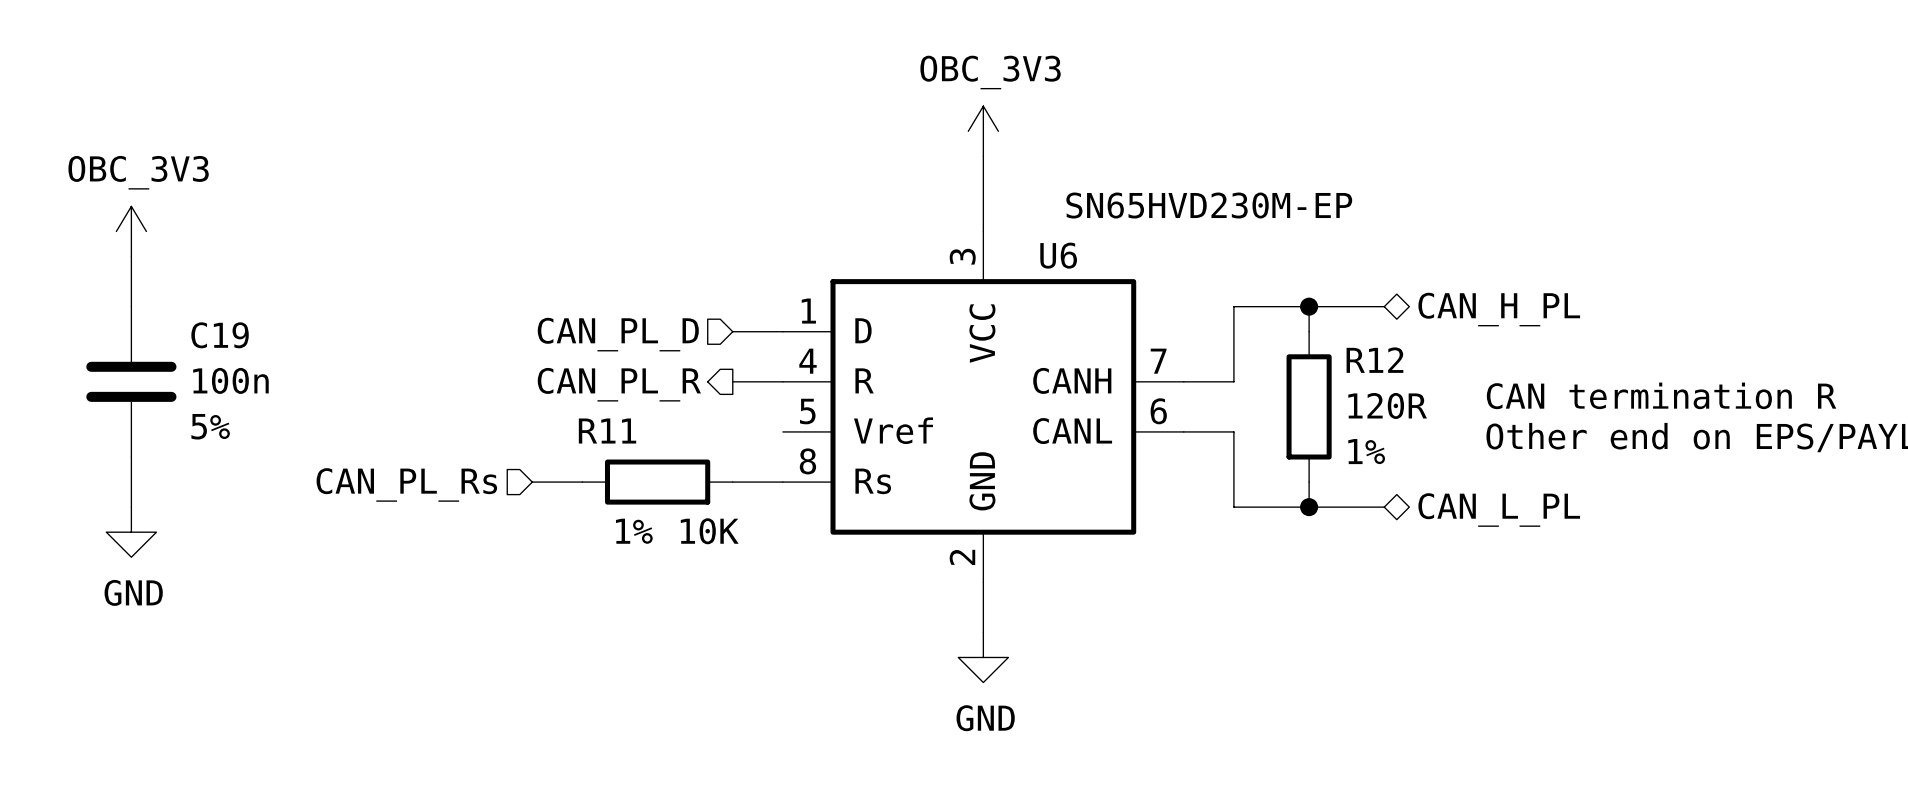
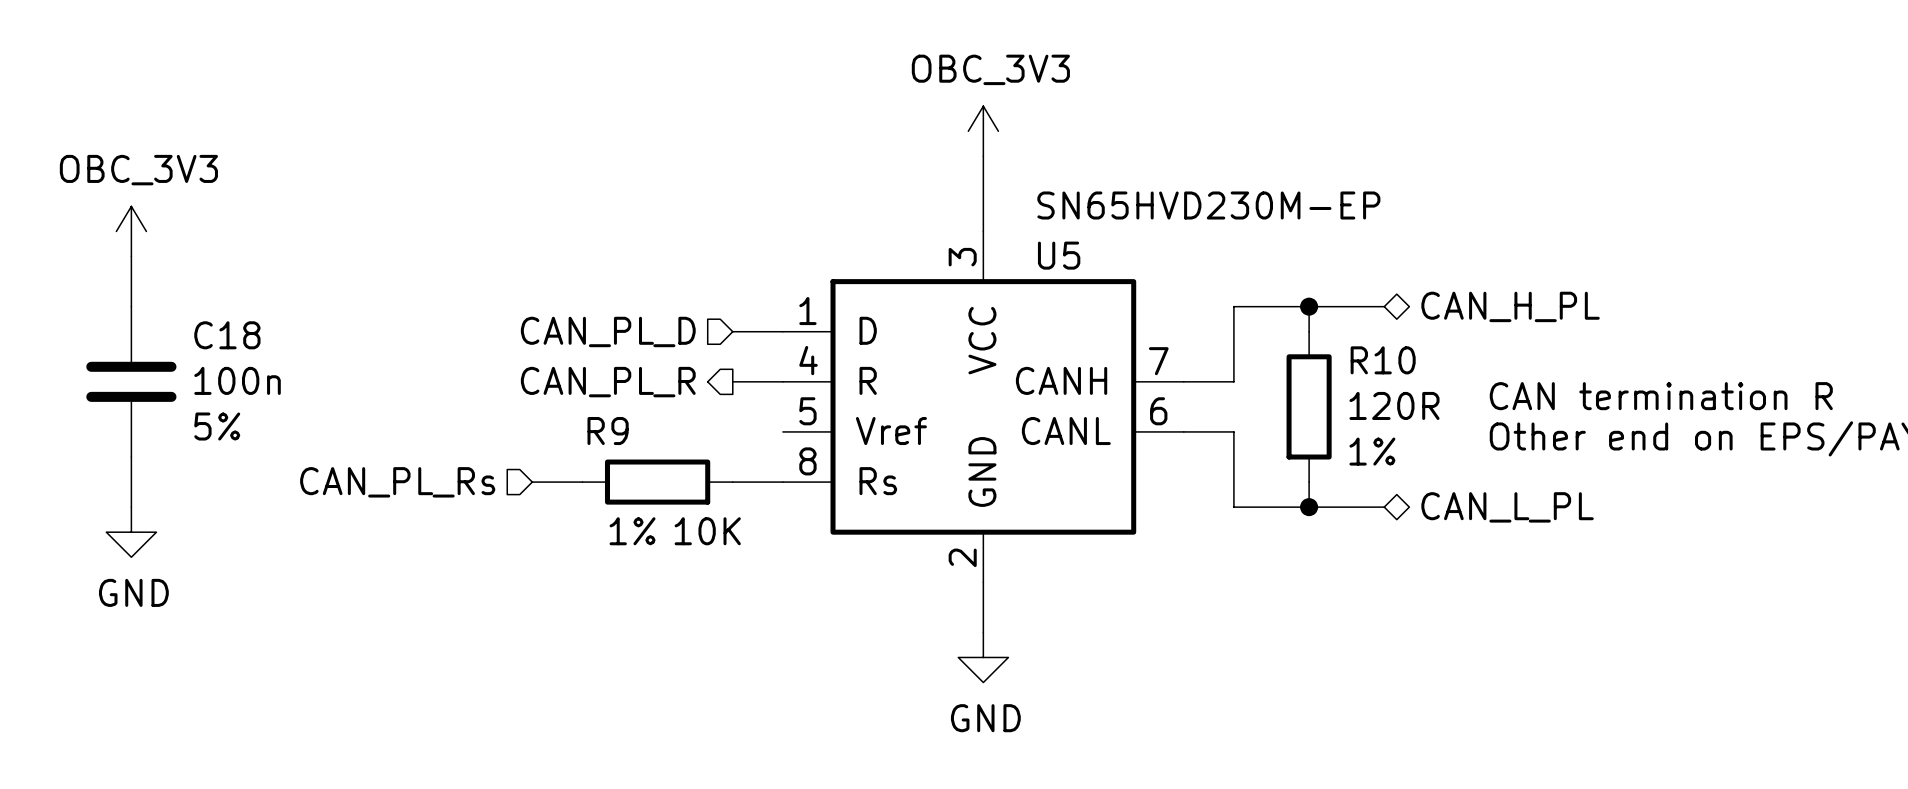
U6 name: U6 (1058, 255) -> U5 (1059, 255)
C19 name: C19 (220, 335) -> C18 (227, 335)
R12 name: R12 (1374, 360) -> R10 (1383, 360)
R11 name: R11 (607, 431) -> R9 (608, 431)

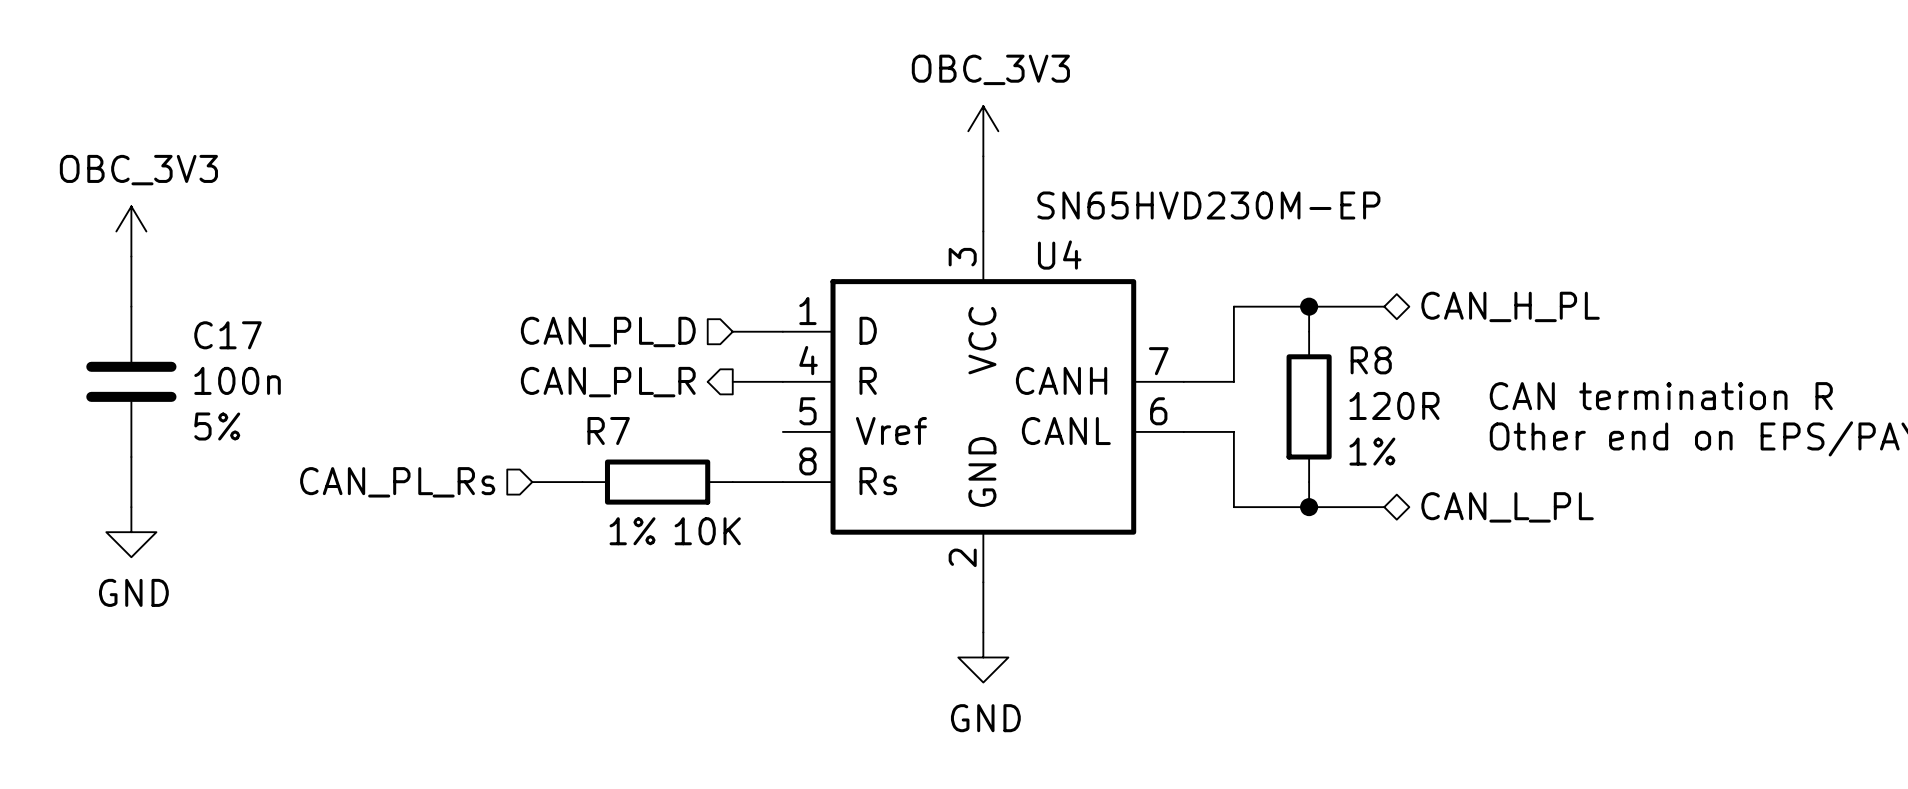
U5 name: U5 (1059, 255) -> U4 (1059, 255)
C18 name: C18 (227, 335) -> C17 (227, 335)
R10 name: R10 (1383, 360) -> R8 (1371, 360)
R9 name: R9 (608, 431) -> R7 (608, 431)

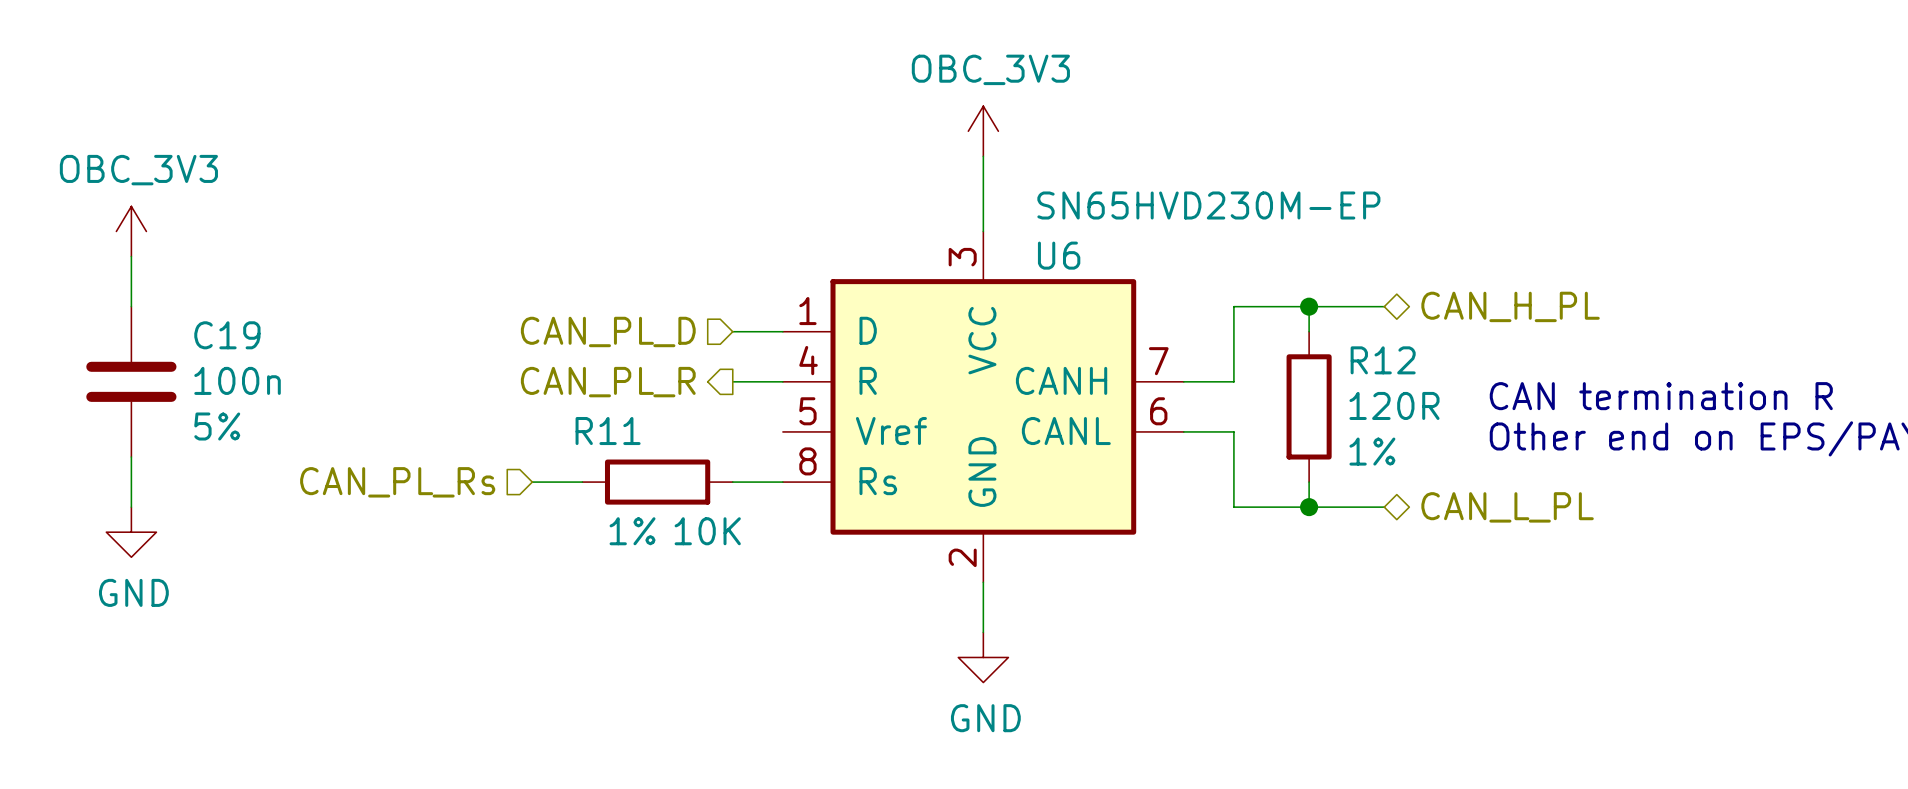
U4 name: U4 (1059, 255) -> U6 (1059, 255)
C17 name: C17 (227, 335) -> C19 (227, 335)
R8 name: R8 (1371, 360) -> R12 (1383, 360)
R7 name: R7 (608, 431) -> R11 (608, 431)

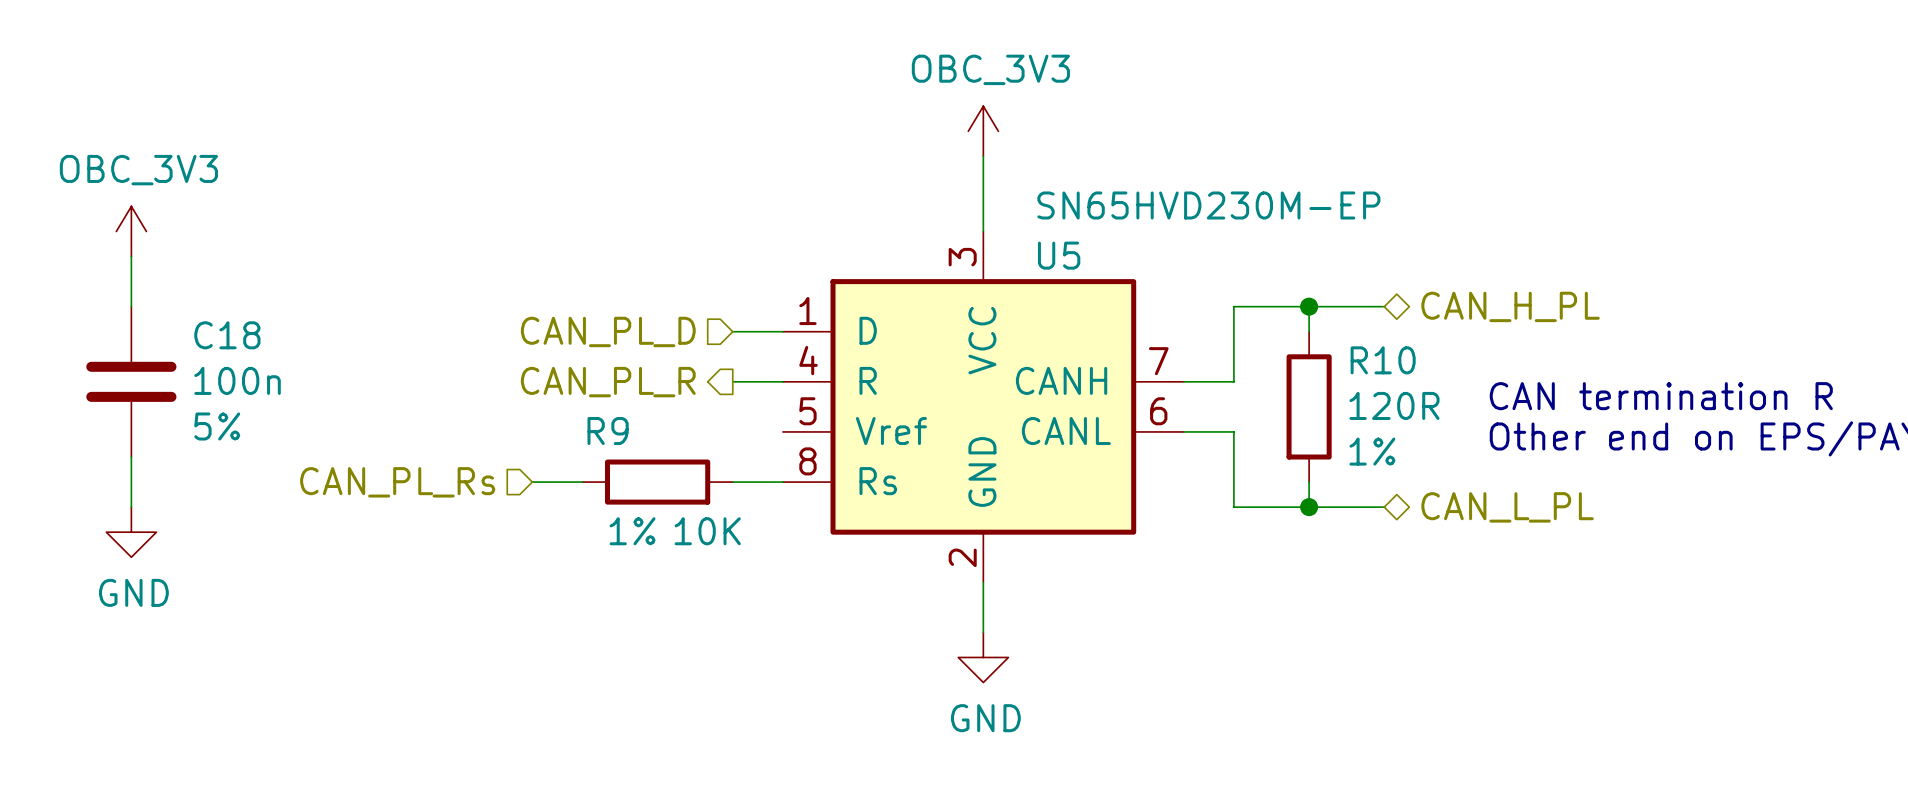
U6 name: U6 (1059, 255) -> U5 (1059, 255)
C19 name: C19 (227, 335) -> C18 (227, 335)
R12 name: R12 (1383, 360) -> R10 (1383, 360)
R11 name: R11 (608, 431) -> R9 (608, 431)

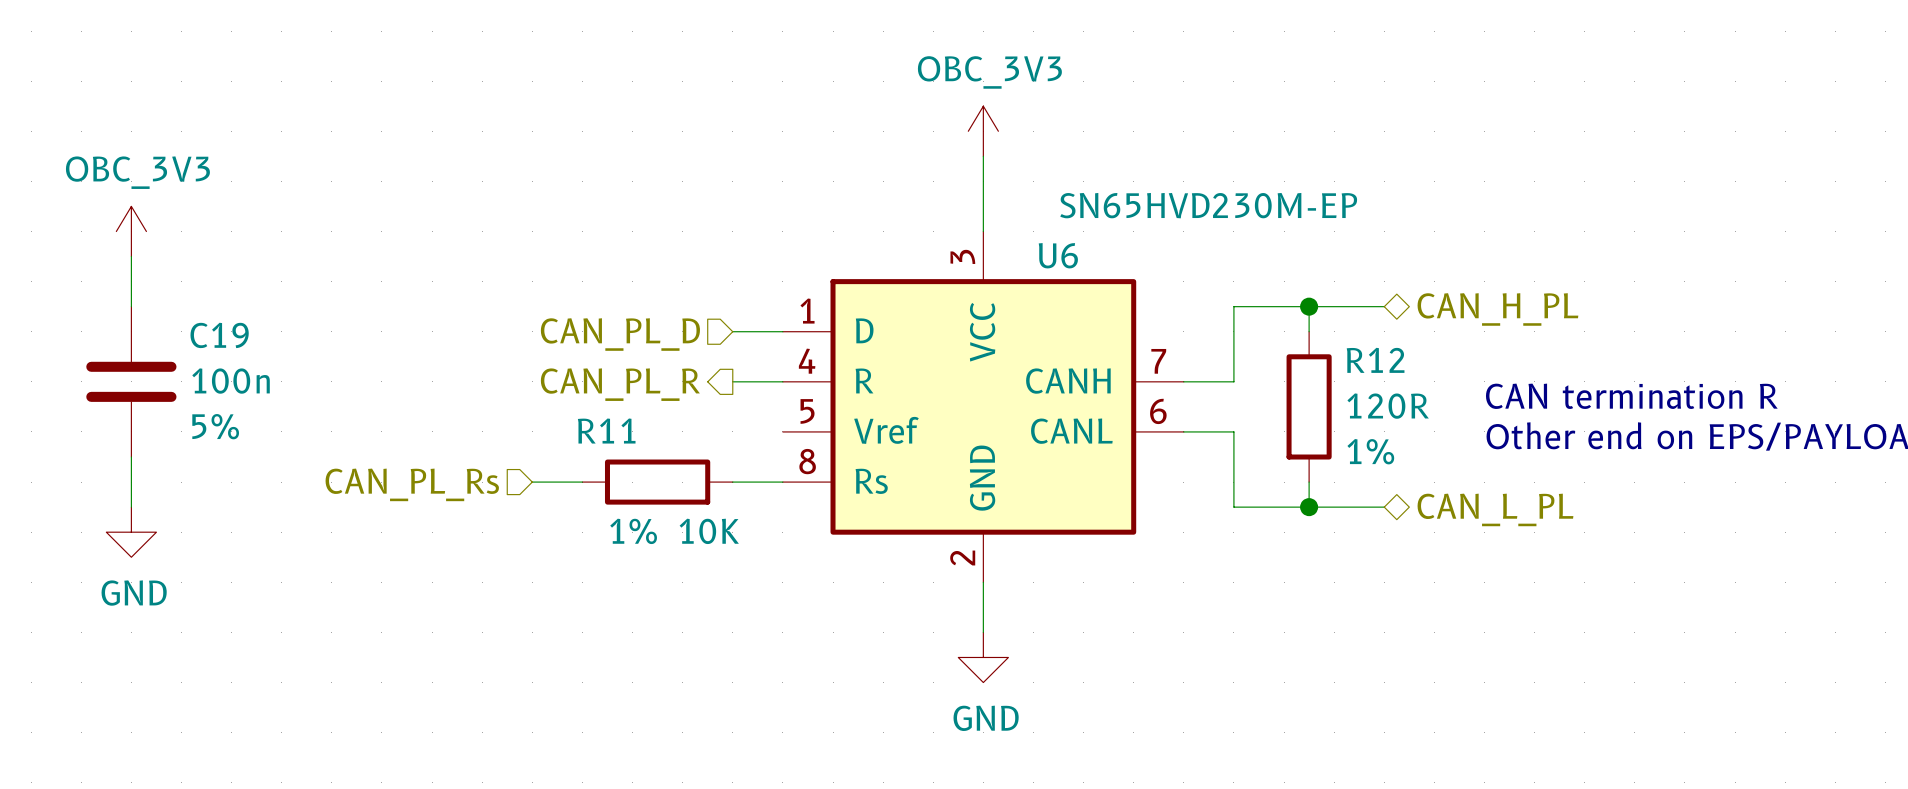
U5 name: U5 (1059, 255) -> U6 (1058, 255)
C18 name: C18 (227, 335) -> C19 (219, 335)
R10 name: R10 (1383, 360) -> R12 (1375, 360)
R9 name: R9 (608, 431) -> R11 (606, 431)

